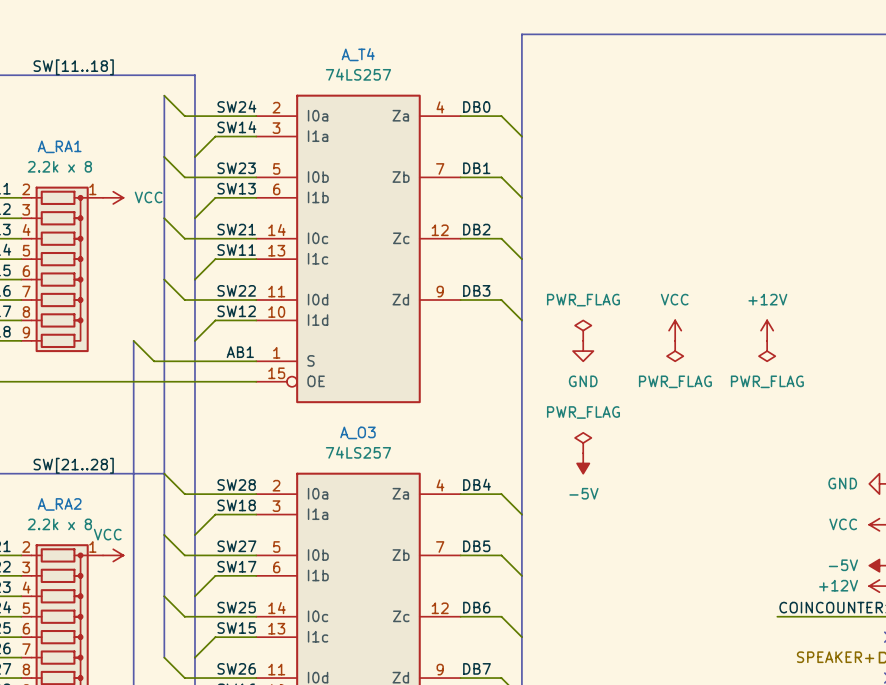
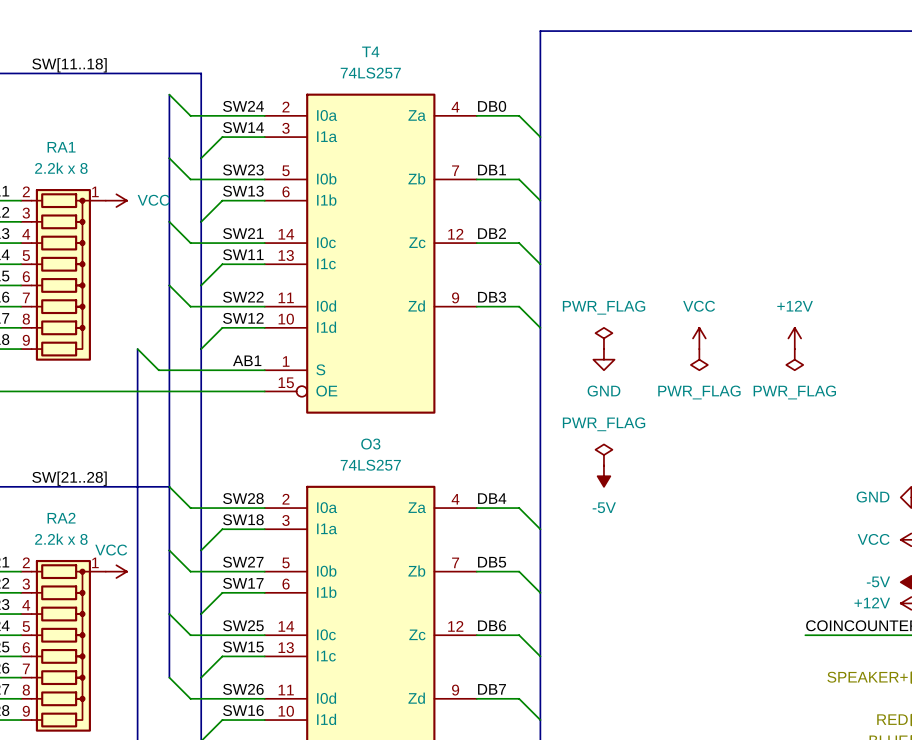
A_T4 name: A_T4 (358, 54) -> T4 (370, 51)
A_RA1 name: A_RA1 (59, 146) -> RA1 (61, 147)
A_O3 name: A_O3 (357, 432) -> O3 (370, 444)
A_RA2 name: A_RA2 (59, 504) -> RA2 (61, 518)

